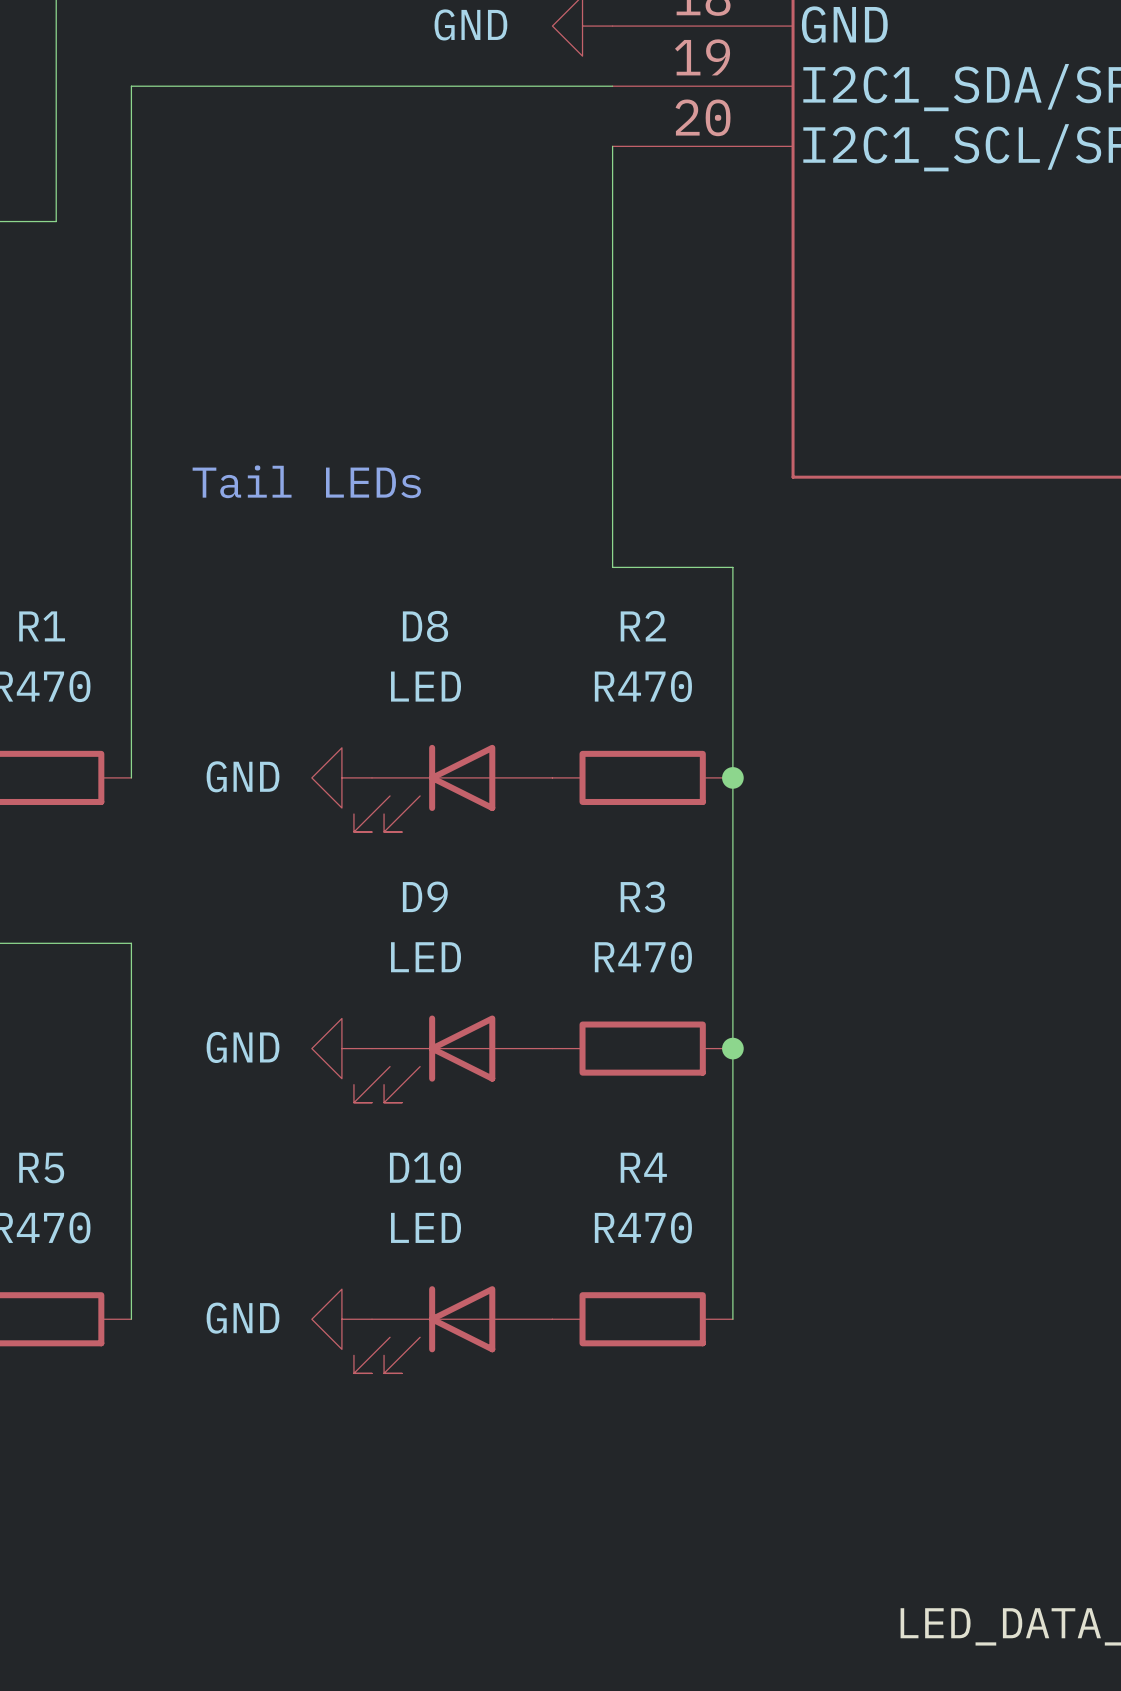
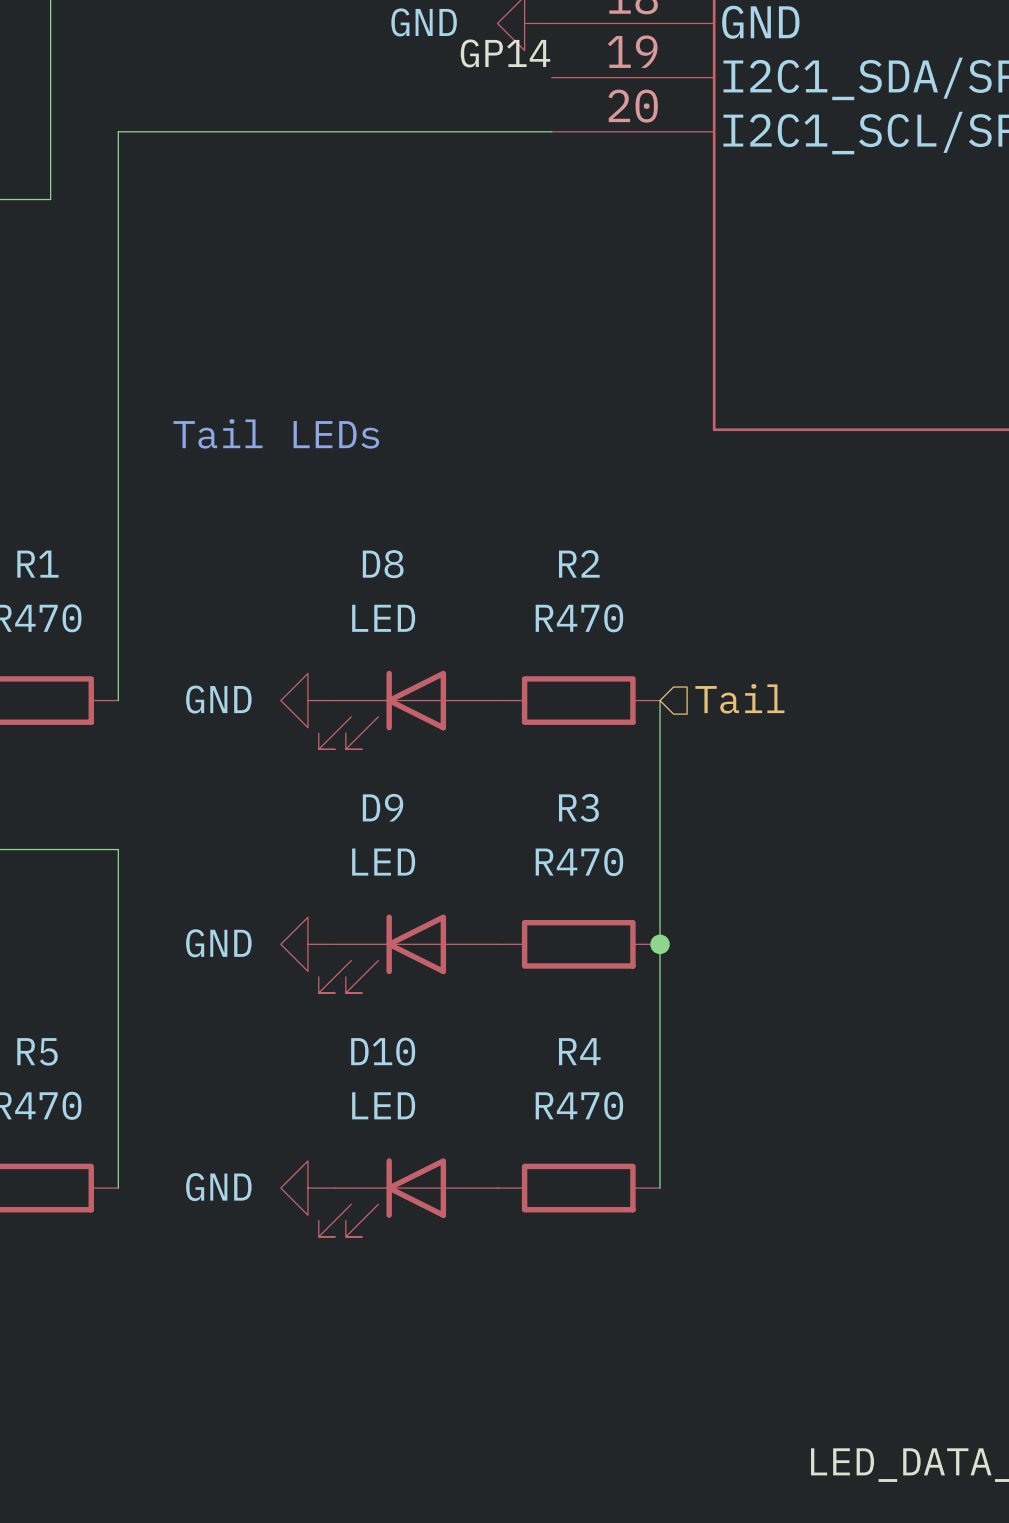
label: none -> GP14 (505, 53)
wire: (612, 86) (131, 86) (131, 146) -> (551, 131) (118, 131)
wire: (612, 146) (612, 567) (732, 567) (732, 777) -> none
hierarchical label: none -> Tail (739, 698)
junction: (732, 777) -> none

